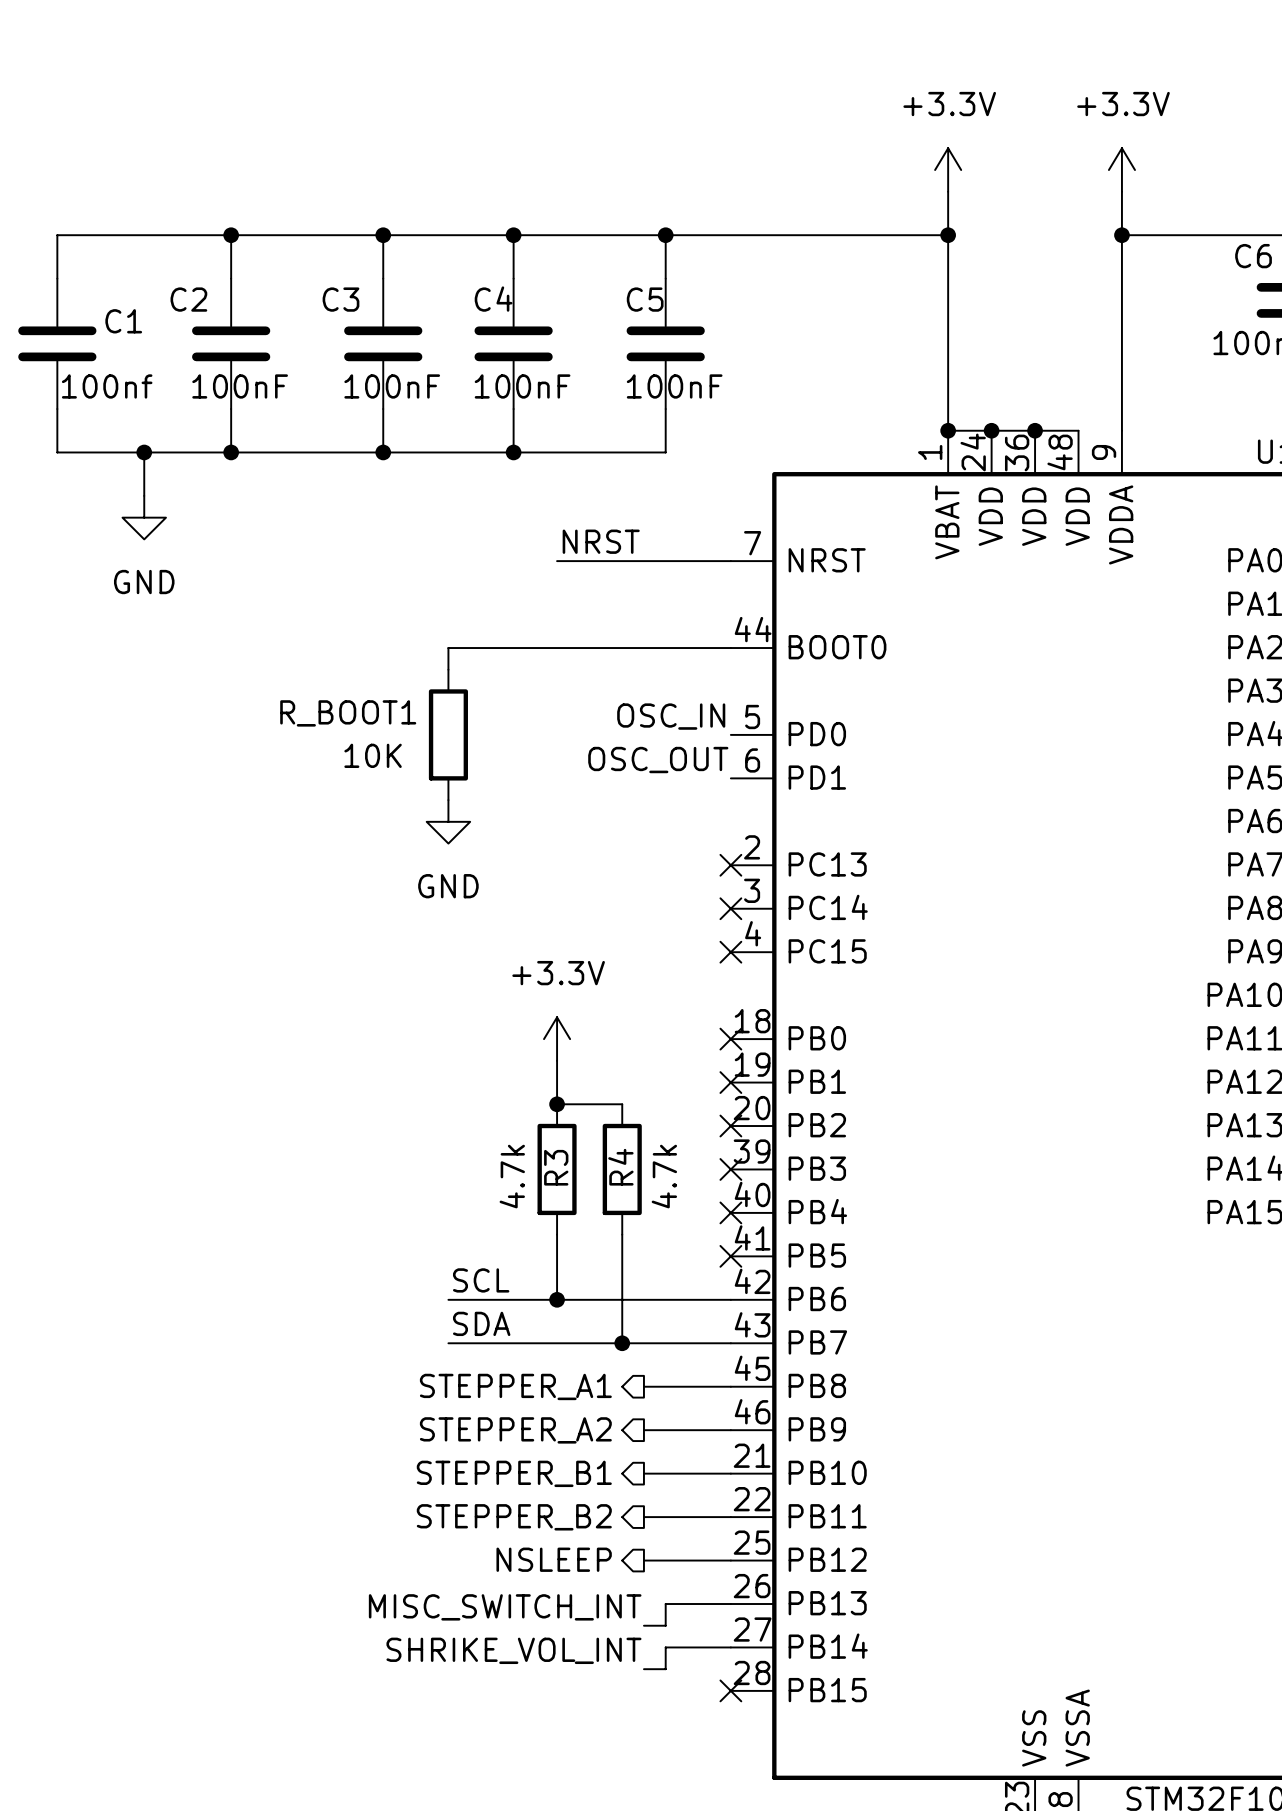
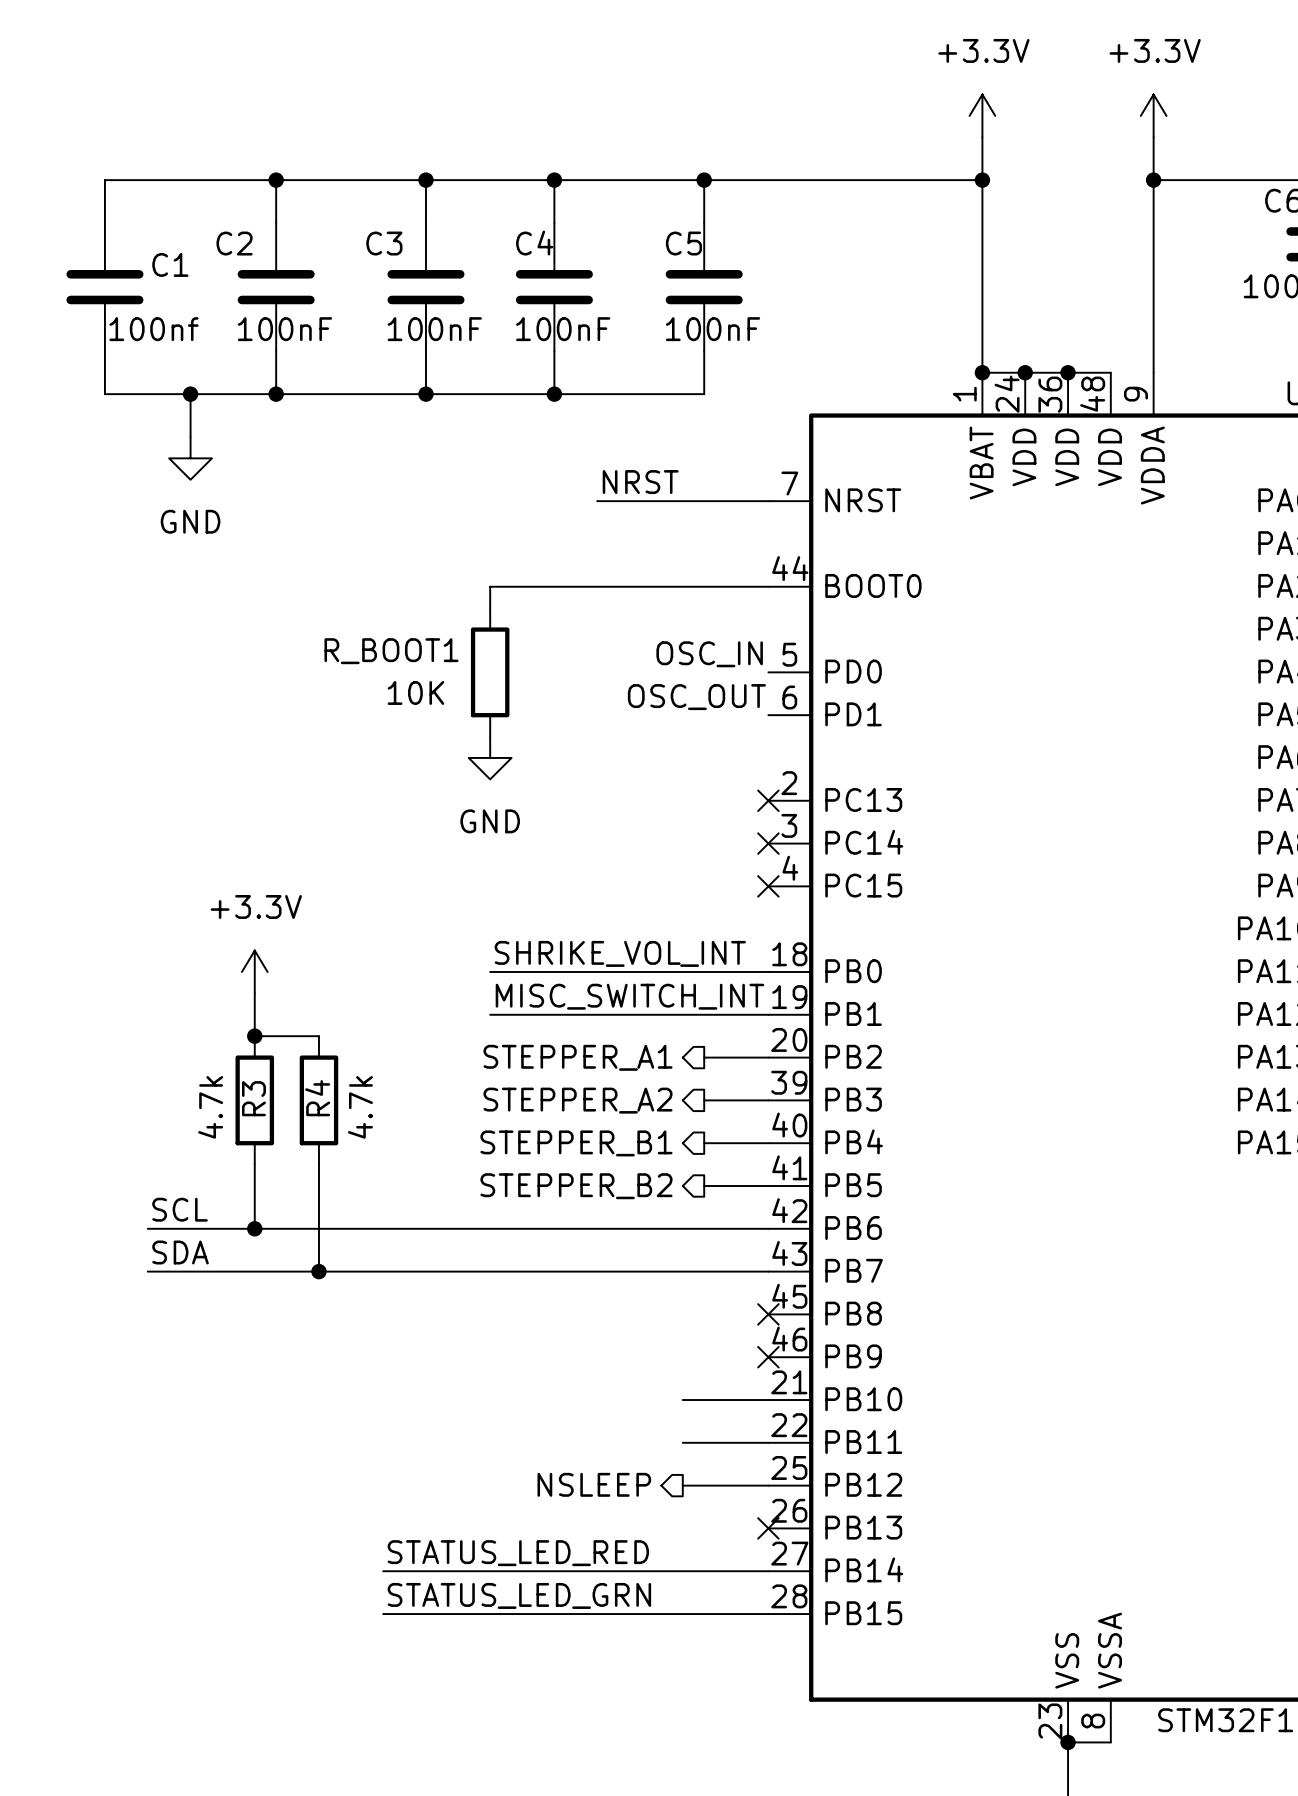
label: none -> SHRIKE_VOL_INT (620, 953)
wire: none -> (490, 971) (768, 971)
power symbol position: +3.3V (557, 1039) -> +3.3V (254, 971)
no-connect mark: (730, 1039) -> none
wire: (557, 1060) (557, 1104) (622, 1104) -> (254, 993) (254, 1036) (318, 1036)
label: none -> MISC_SWITCH_INT (629, 996)
wire: none -> (490, 1014) (768, 1014)
no-connect mark: (730, 1082) -> none
junction: none -> (254, 1036)
junction: (557, 1104) -> none
wire: none -> (704, 1057) (768, 1057)
no-connect mark: (730, 1126) -> none
R3 position: (557, 1169) -> (254, 1100)
R4 position: (622, 1169) -> (318, 1100)
wire: none -> (704, 1100) (768, 1100)
no-connect mark: (730, 1169) -> none
wire: none -> (704, 1143) (768, 1143)
no-connect mark: (730, 1212) -> none
wire: (557, 1234) (557, 1299) -> (254, 1164) (254, 1228)
wire: (622, 1234) (622, 1343) -> (318, 1164) (318, 1271)
wire: none -> (704, 1186) (768, 1186)
no-connect mark: (730, 1256) -> none
label position: SCL (481, 1280) -> SCL (180, 1209)
wire: none -> (147, 1228) (490, 1228)
junction: none -> (254, 1228)
junction: (557, 1299) -> none
label position: SDA (481, 1323) -> SDA (180, 1252)
wire: none -> (147, 1271) (490, 1271)
junction: none -> (318, 1271)
junction: (622, 1343) -> none
hierarchical label position: STEPPER_A1 (515, 1386) -> STEPPER_A1 (578, 1057)
wire: (643, 1386) (730, 1386) -> none
no-connect mark: none -> (768, 1314)
hierarchical label position: STEPPER_A2 (515, 1430) -> STEPPER_A2 (578, 1100)
wire: (643, 1430) (730, 1430) -> none
no-connect mark: none -> (768, 1357)
hierarchical label position: STEPPER_B1 (514, 1473) -> STEPPER_B1 (576, 1143)
hierarchical label position: STEPPER_B2 (514, 1517) -> STEPPER_B2 (576, 1186)
wire: (730, 1604) (665, 1604) (665, 1625) (643, 1625) -> none
label: MISC_SWITCH_INT (505, 1607) -> none
label: none -> STATUS_LED_RED (518, 1553)
wire: (665, 1647) (665, 1669) (643, 1669) -> (704, 1571) (383, 1571)
label: SHRIKE_VOL_INT (513, 1650) -> none
label: none -> STATUS_LED_GRN (519, 1595)
wire: none -> (383, 1614) (768, 1614)
no-connect mark position: (730, 1690) -> (768, 1528)

